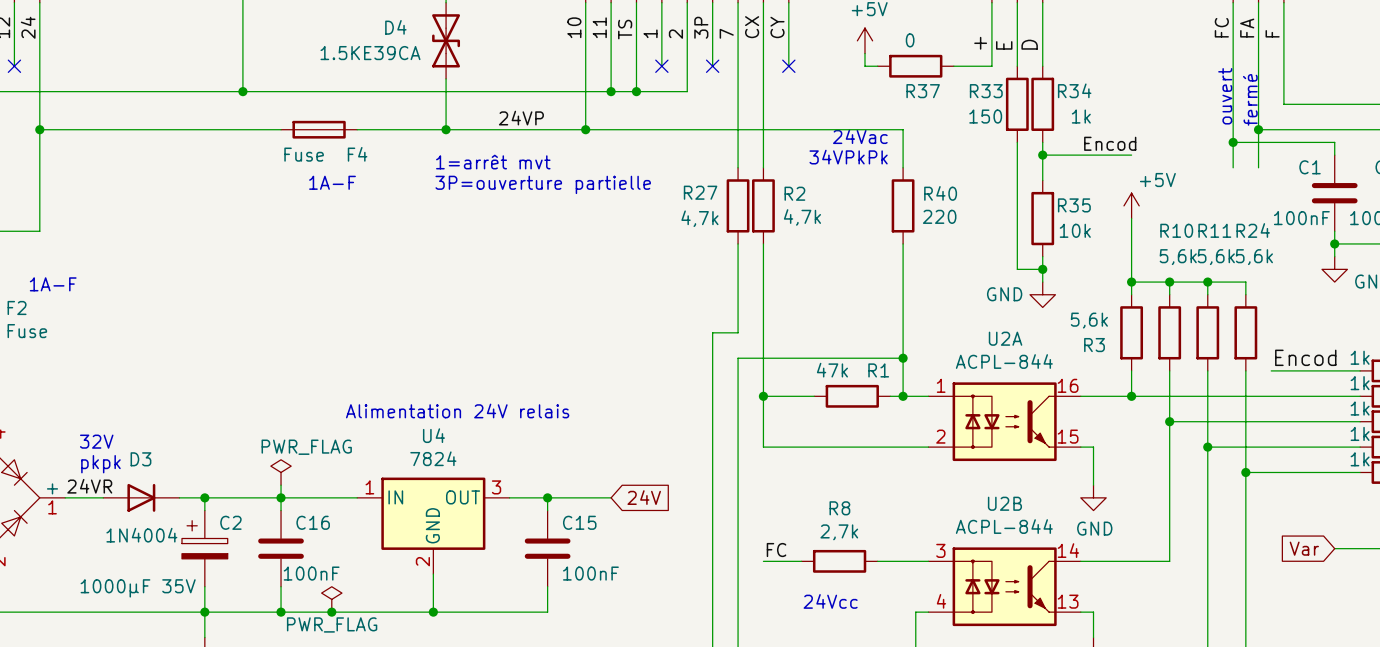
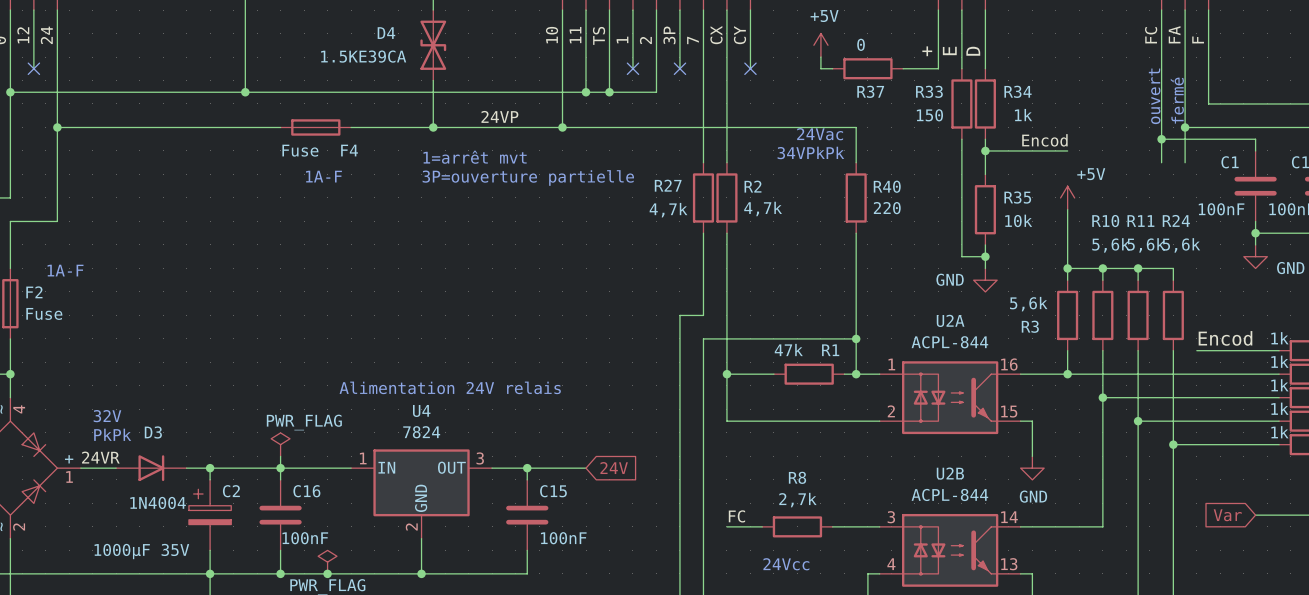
text: pkpk (100, 464) -> PkPk (112, 434)

